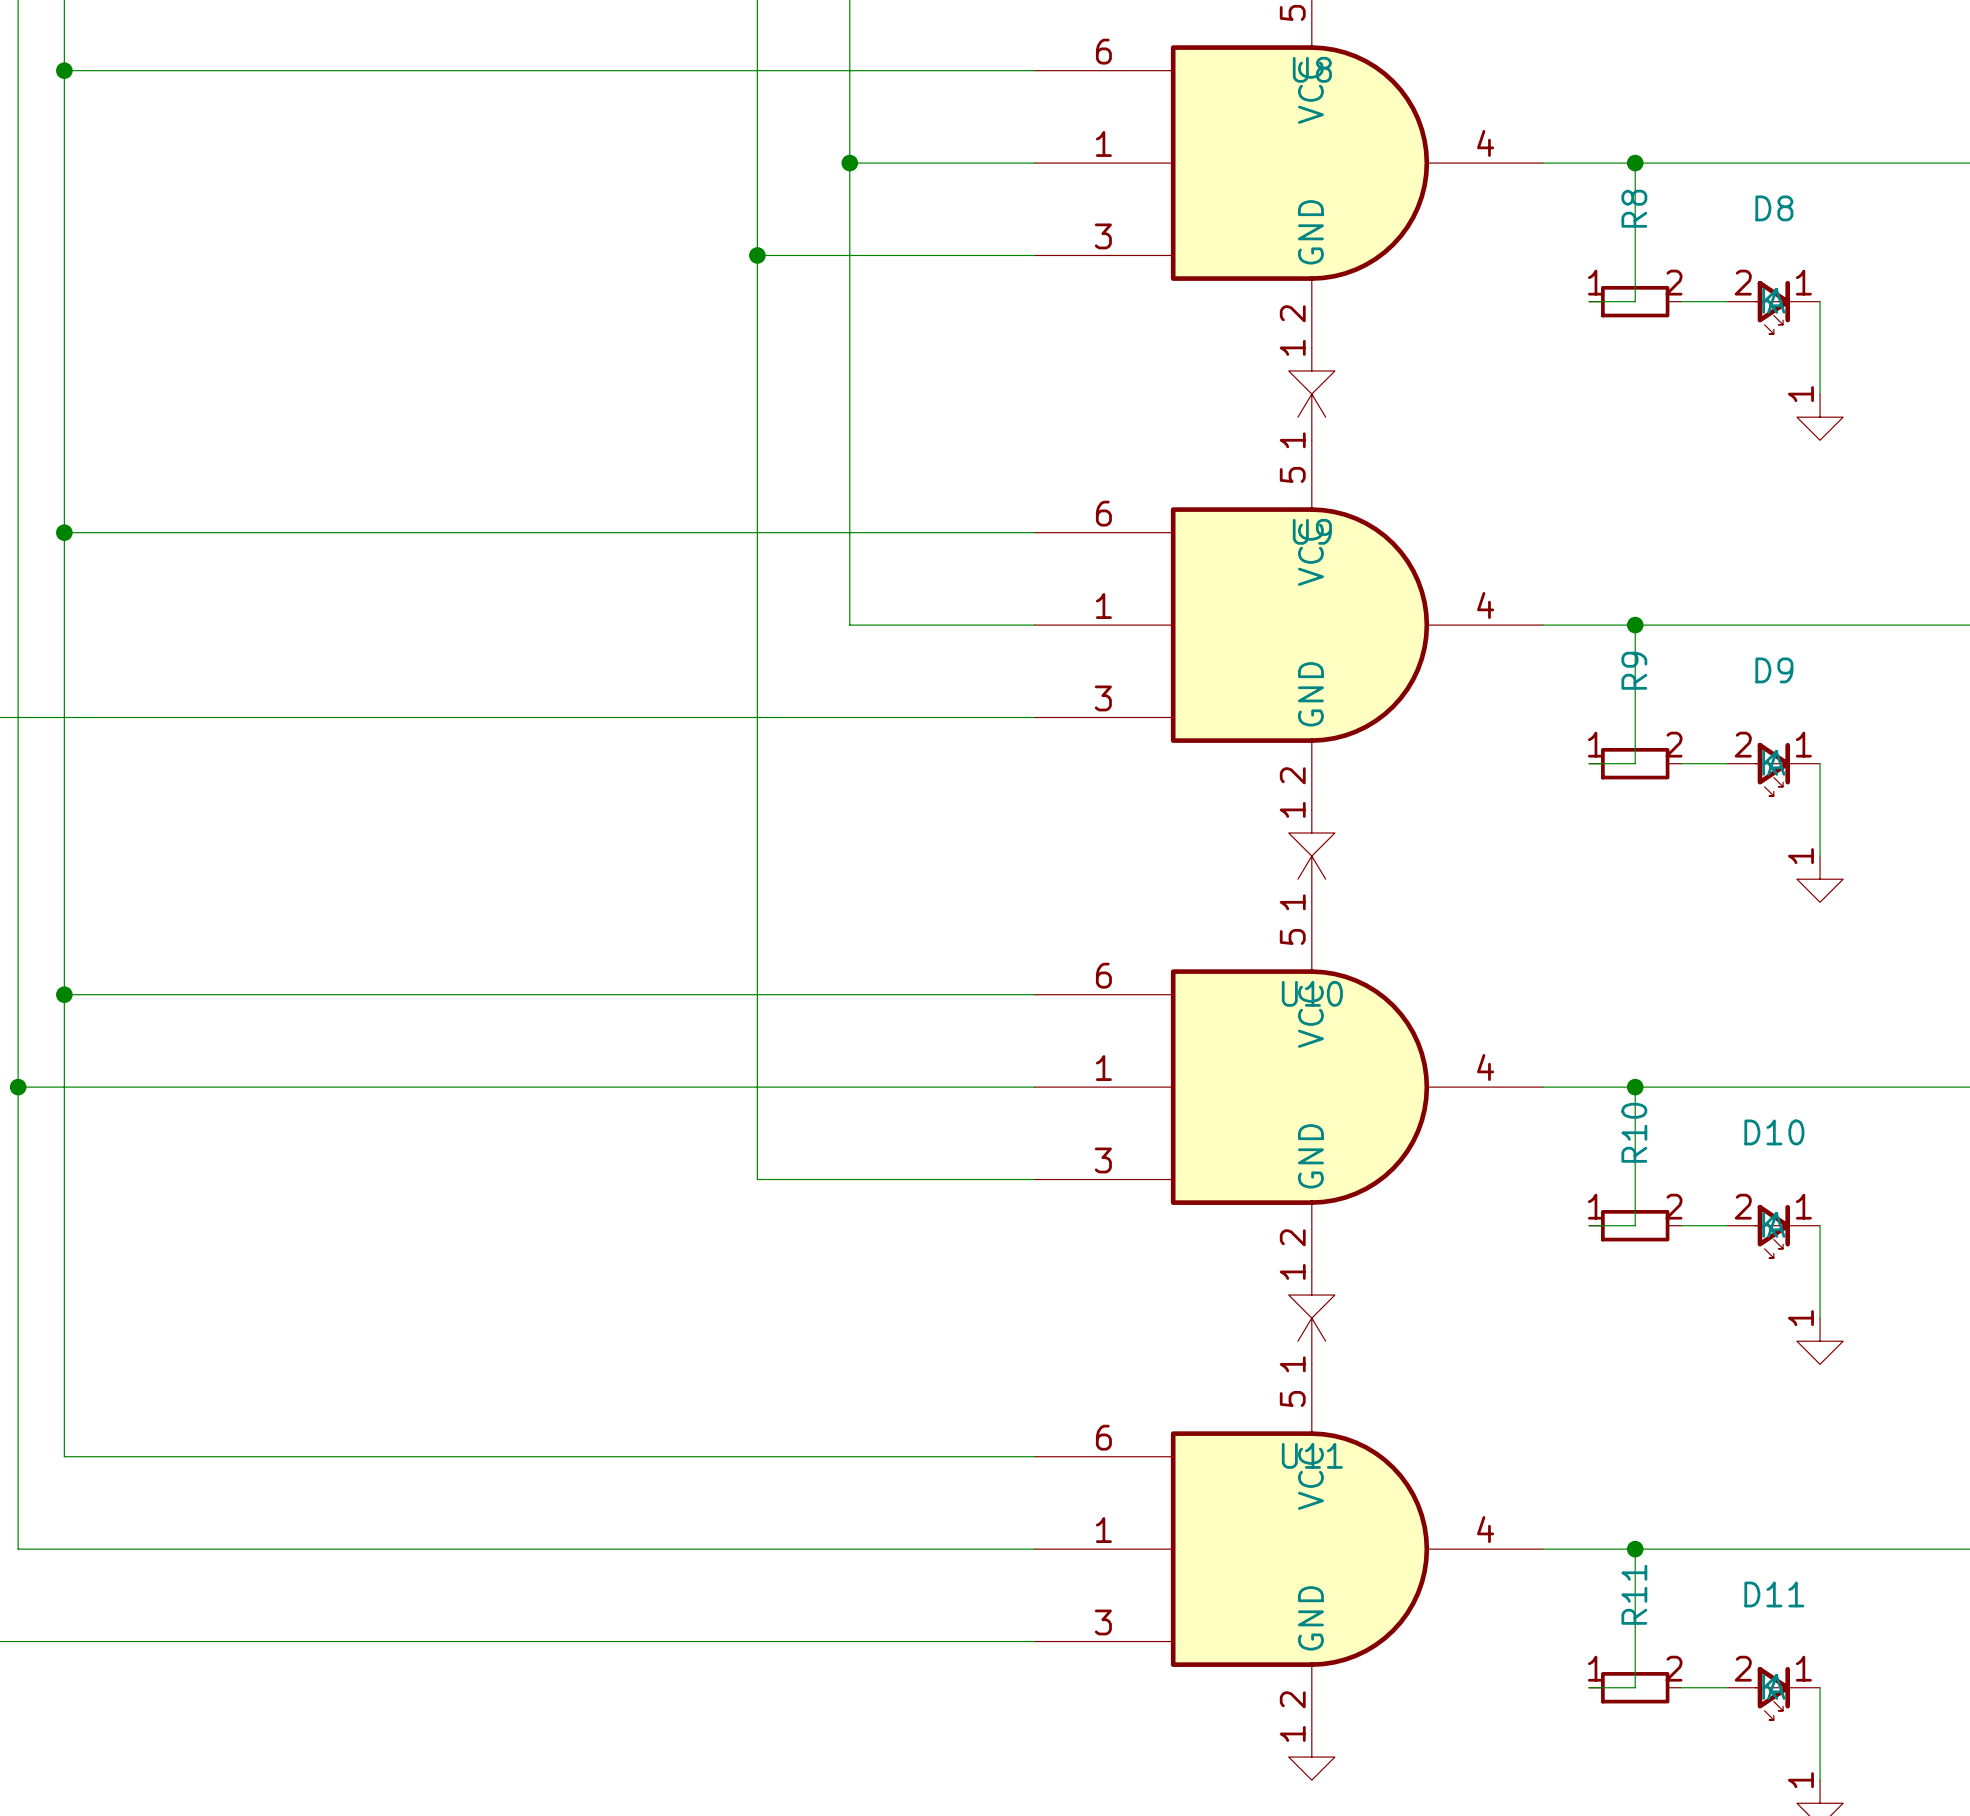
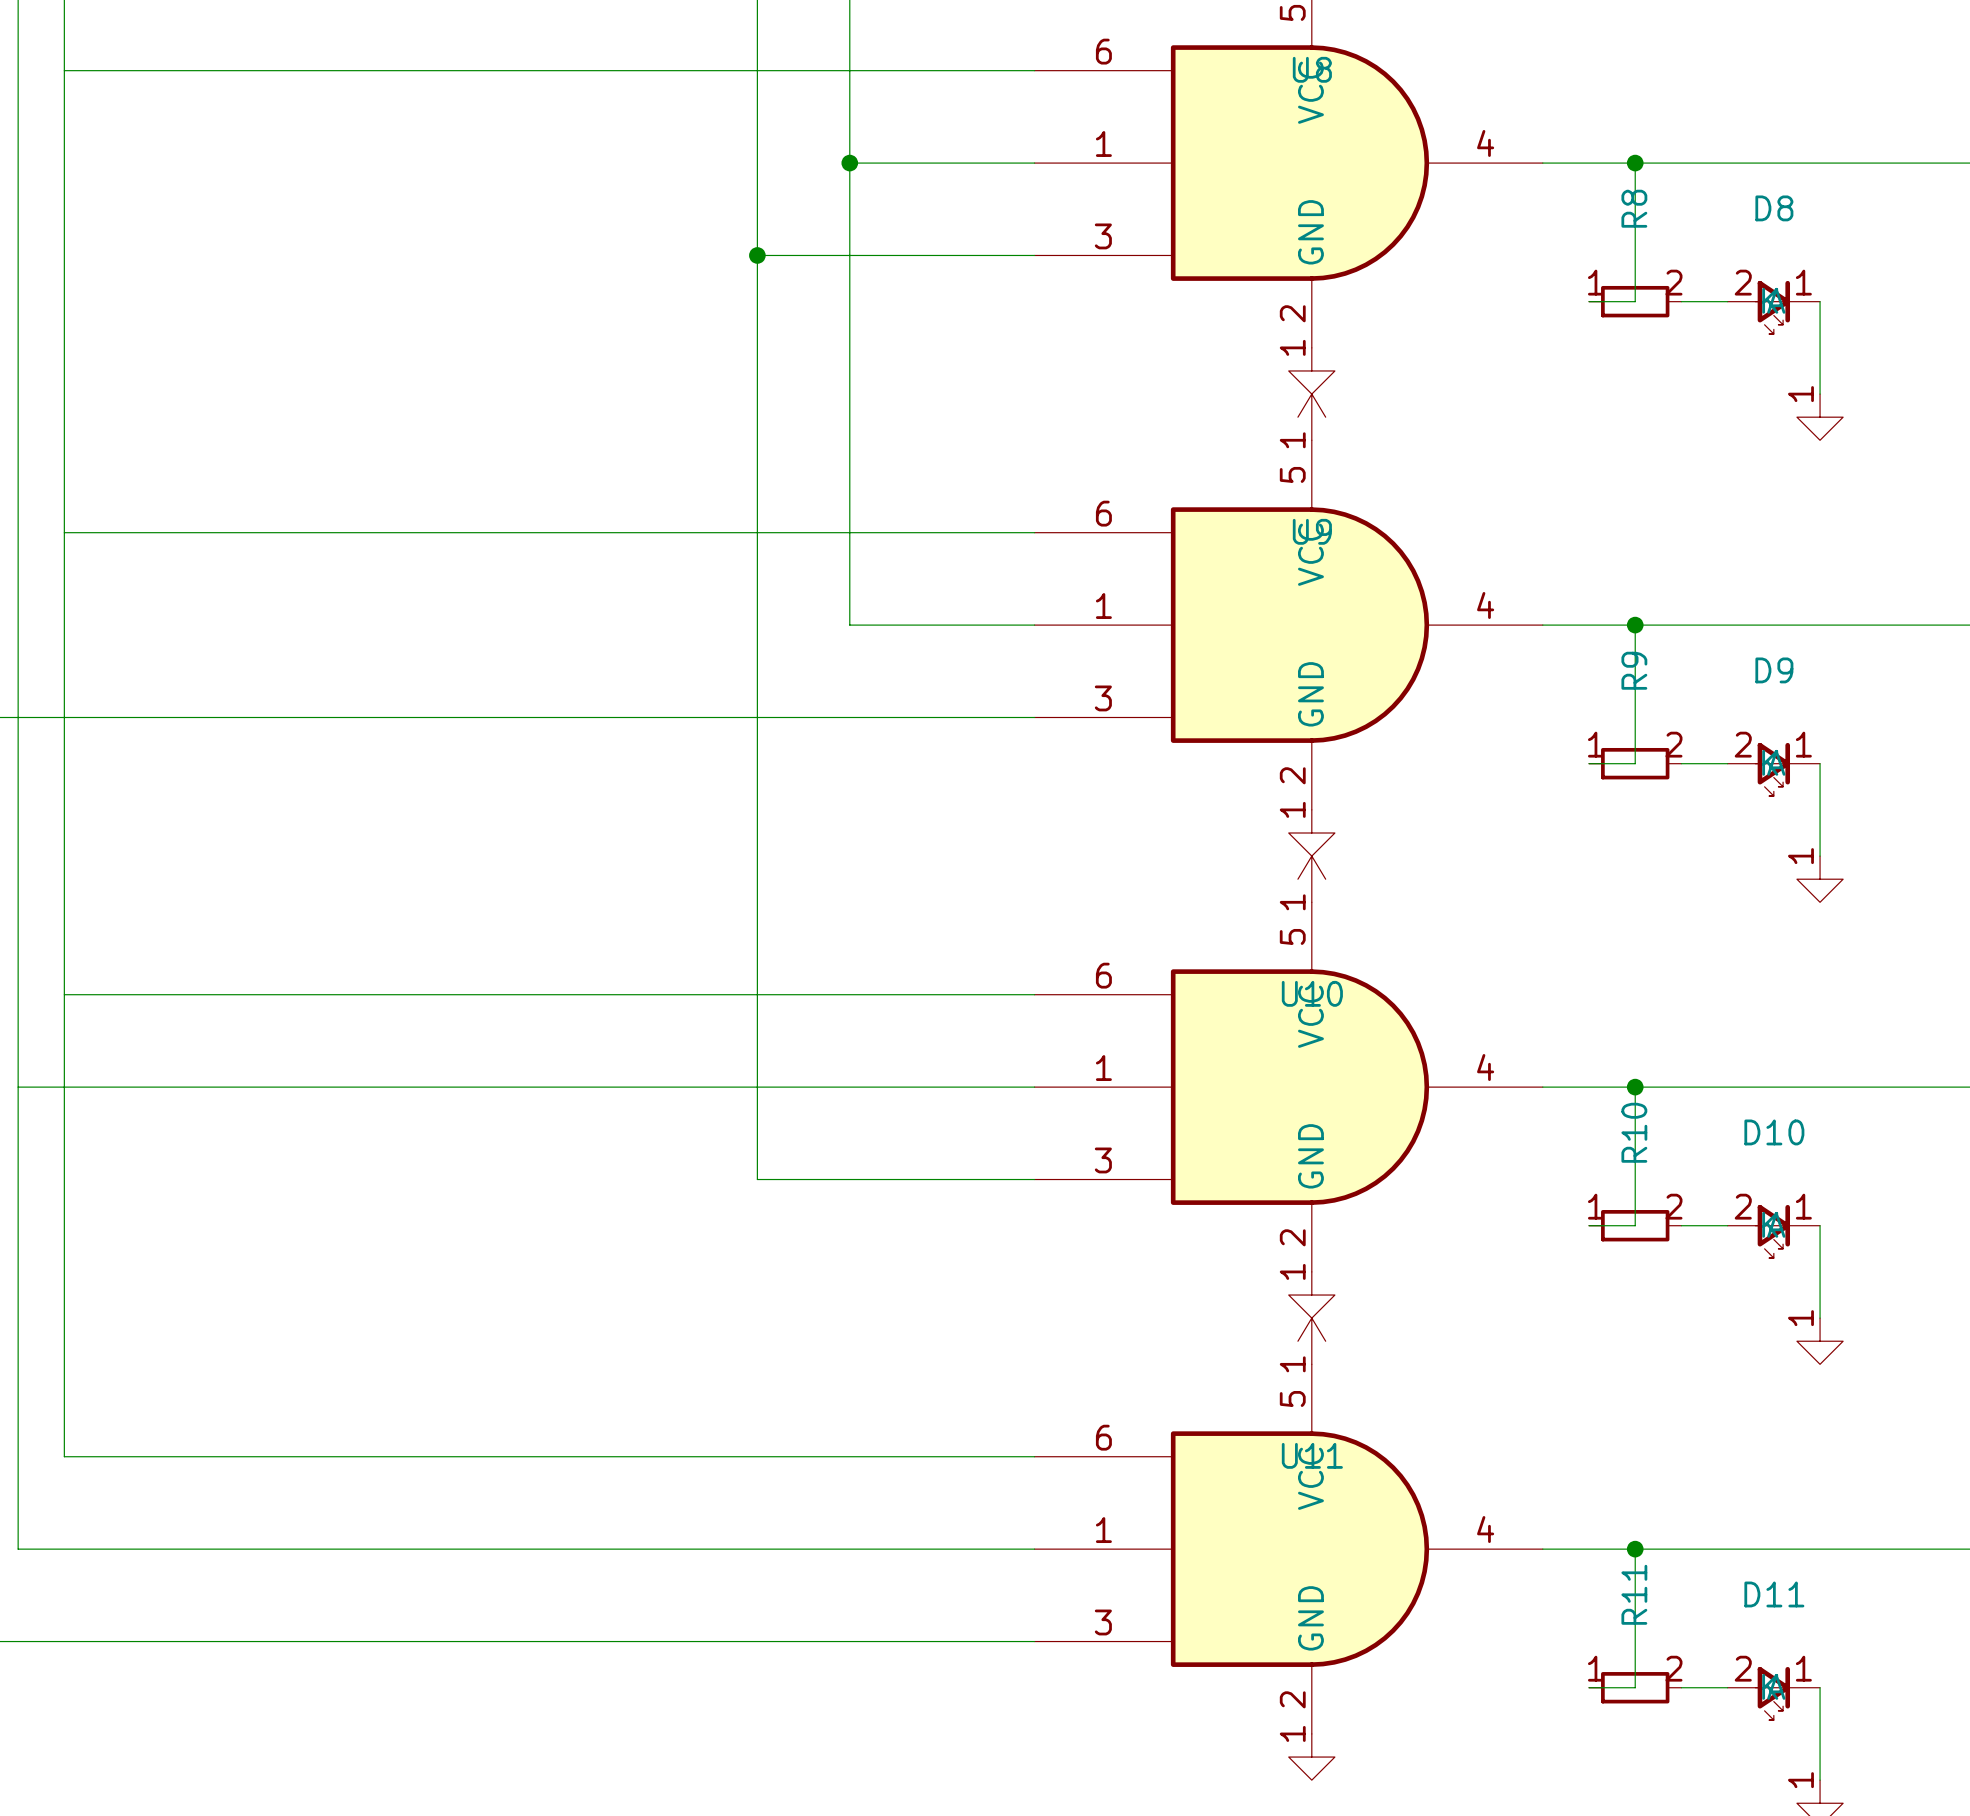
junction: (64, 70) -> none
junction: (64, 532) -> none
junction: (64, 994) -> none
junction: (18, 1087) -> none

